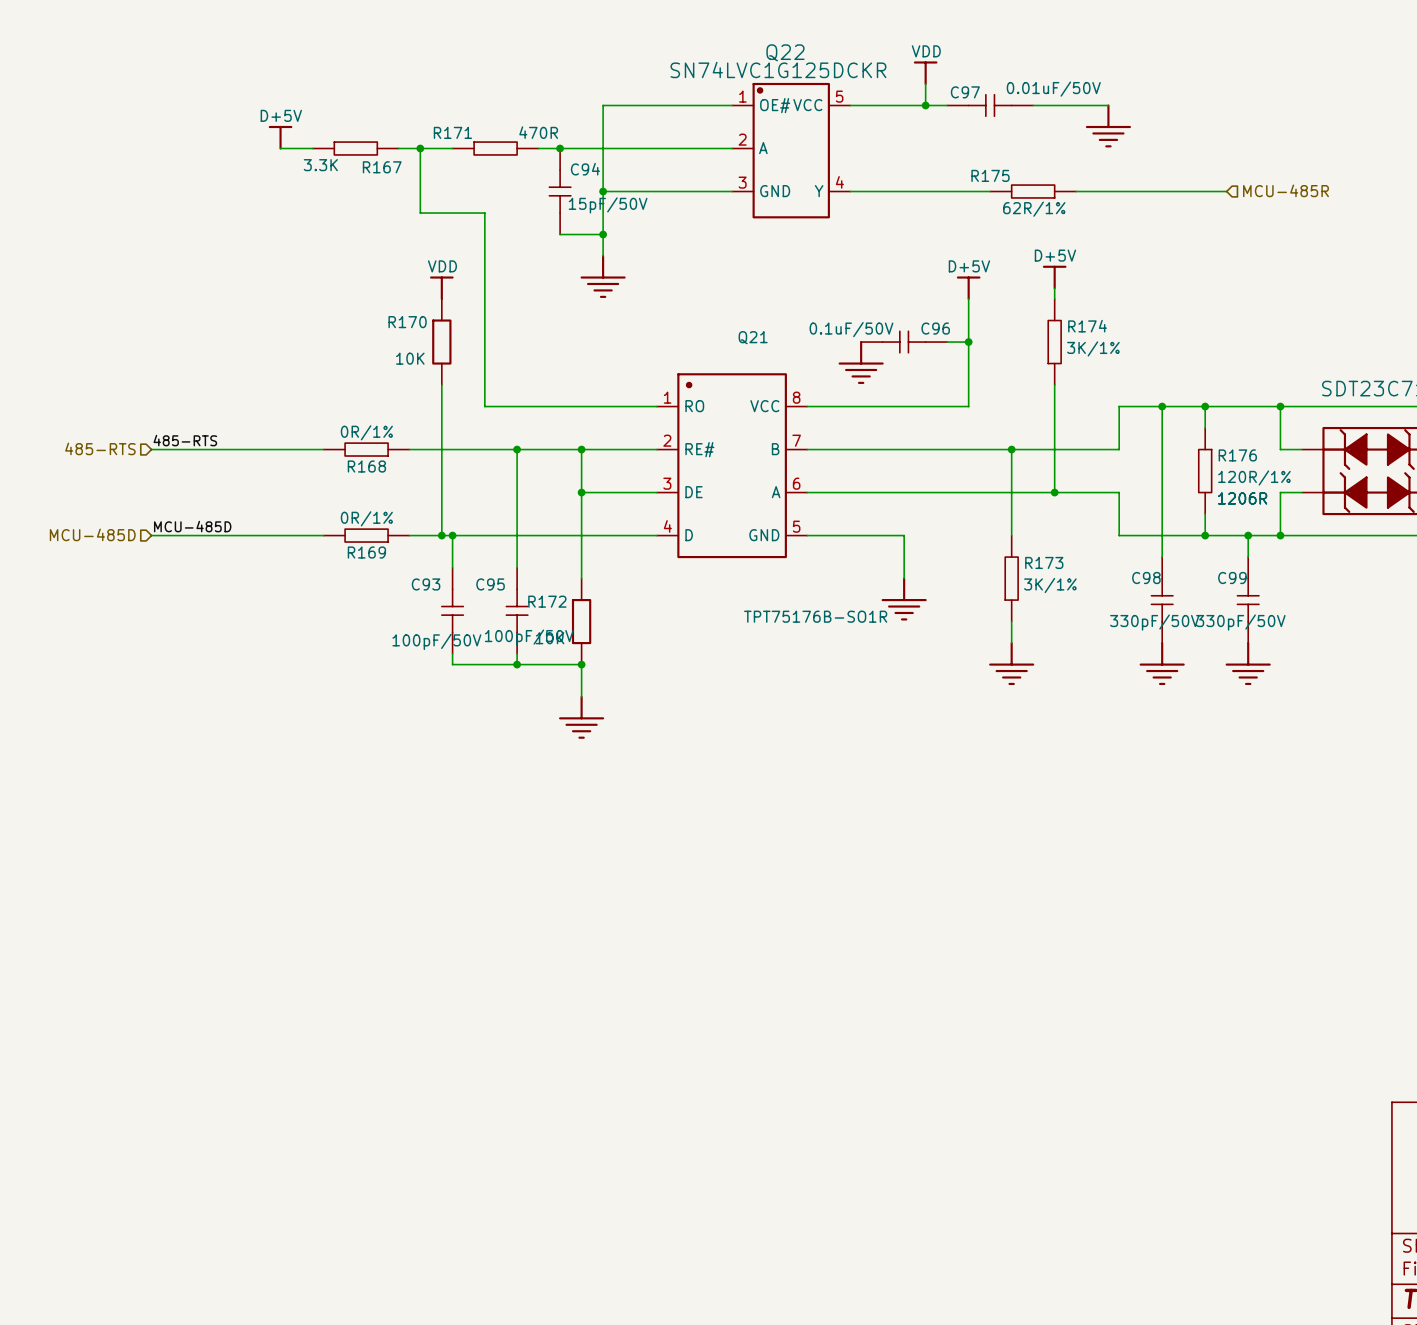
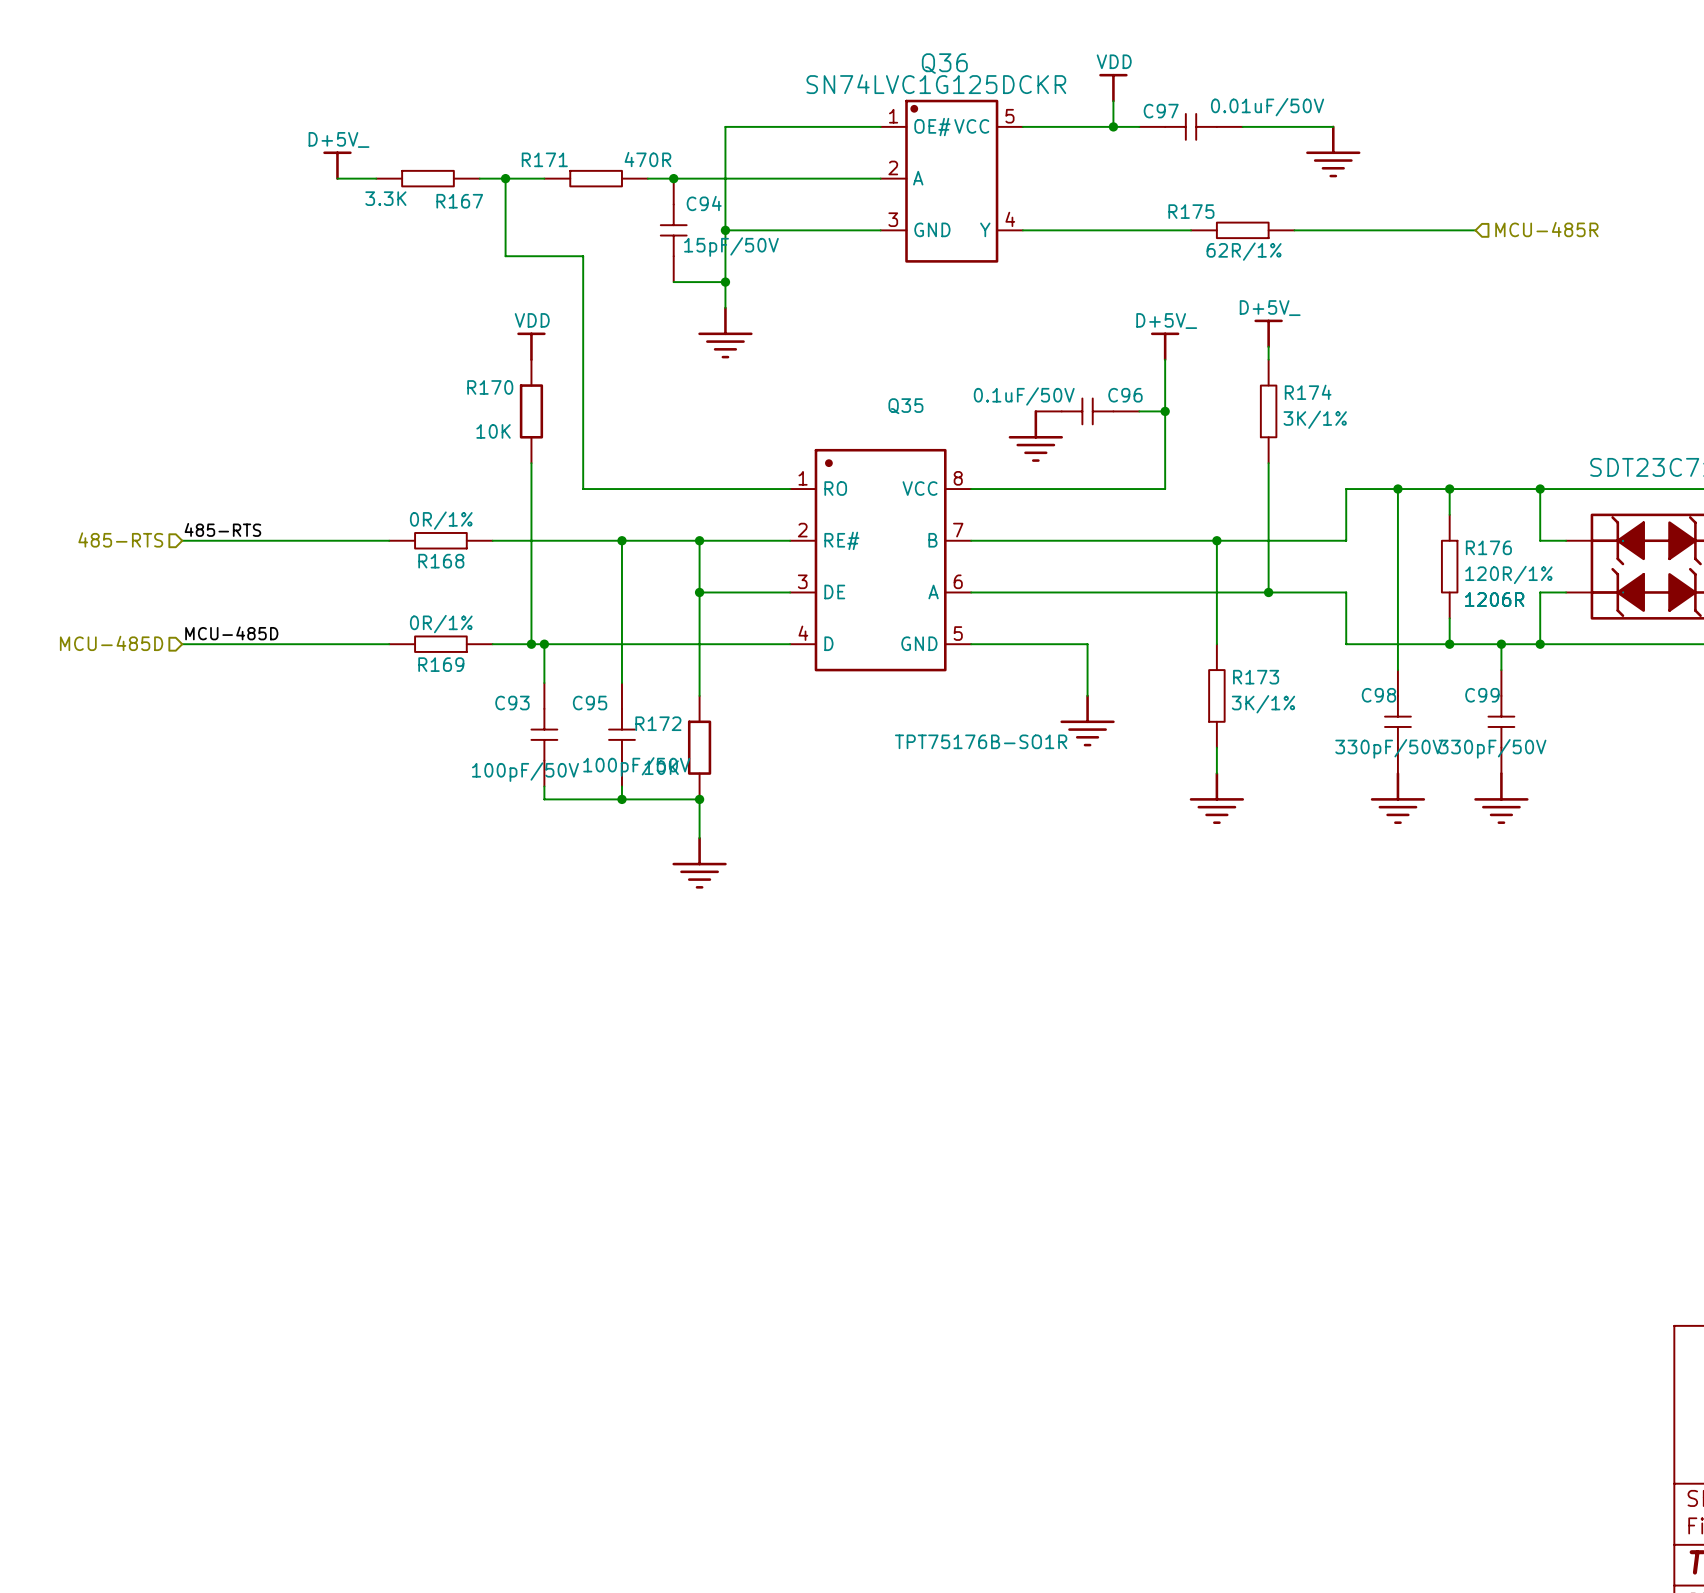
Q22 name: Q22 (785, 52) -> Q36 (944, 63)
power symbol: D+5V (280, 137) -> D+5V_ (337, 165)
power symbol: D+5V (1054, 277) -> D+5V_ (1268, 333)
power symbol: D+5V (968, 288) -> D+5V_ (1165, 346)
Q21 name: Q21 (753, 337) -> Q35 (905, 406)

